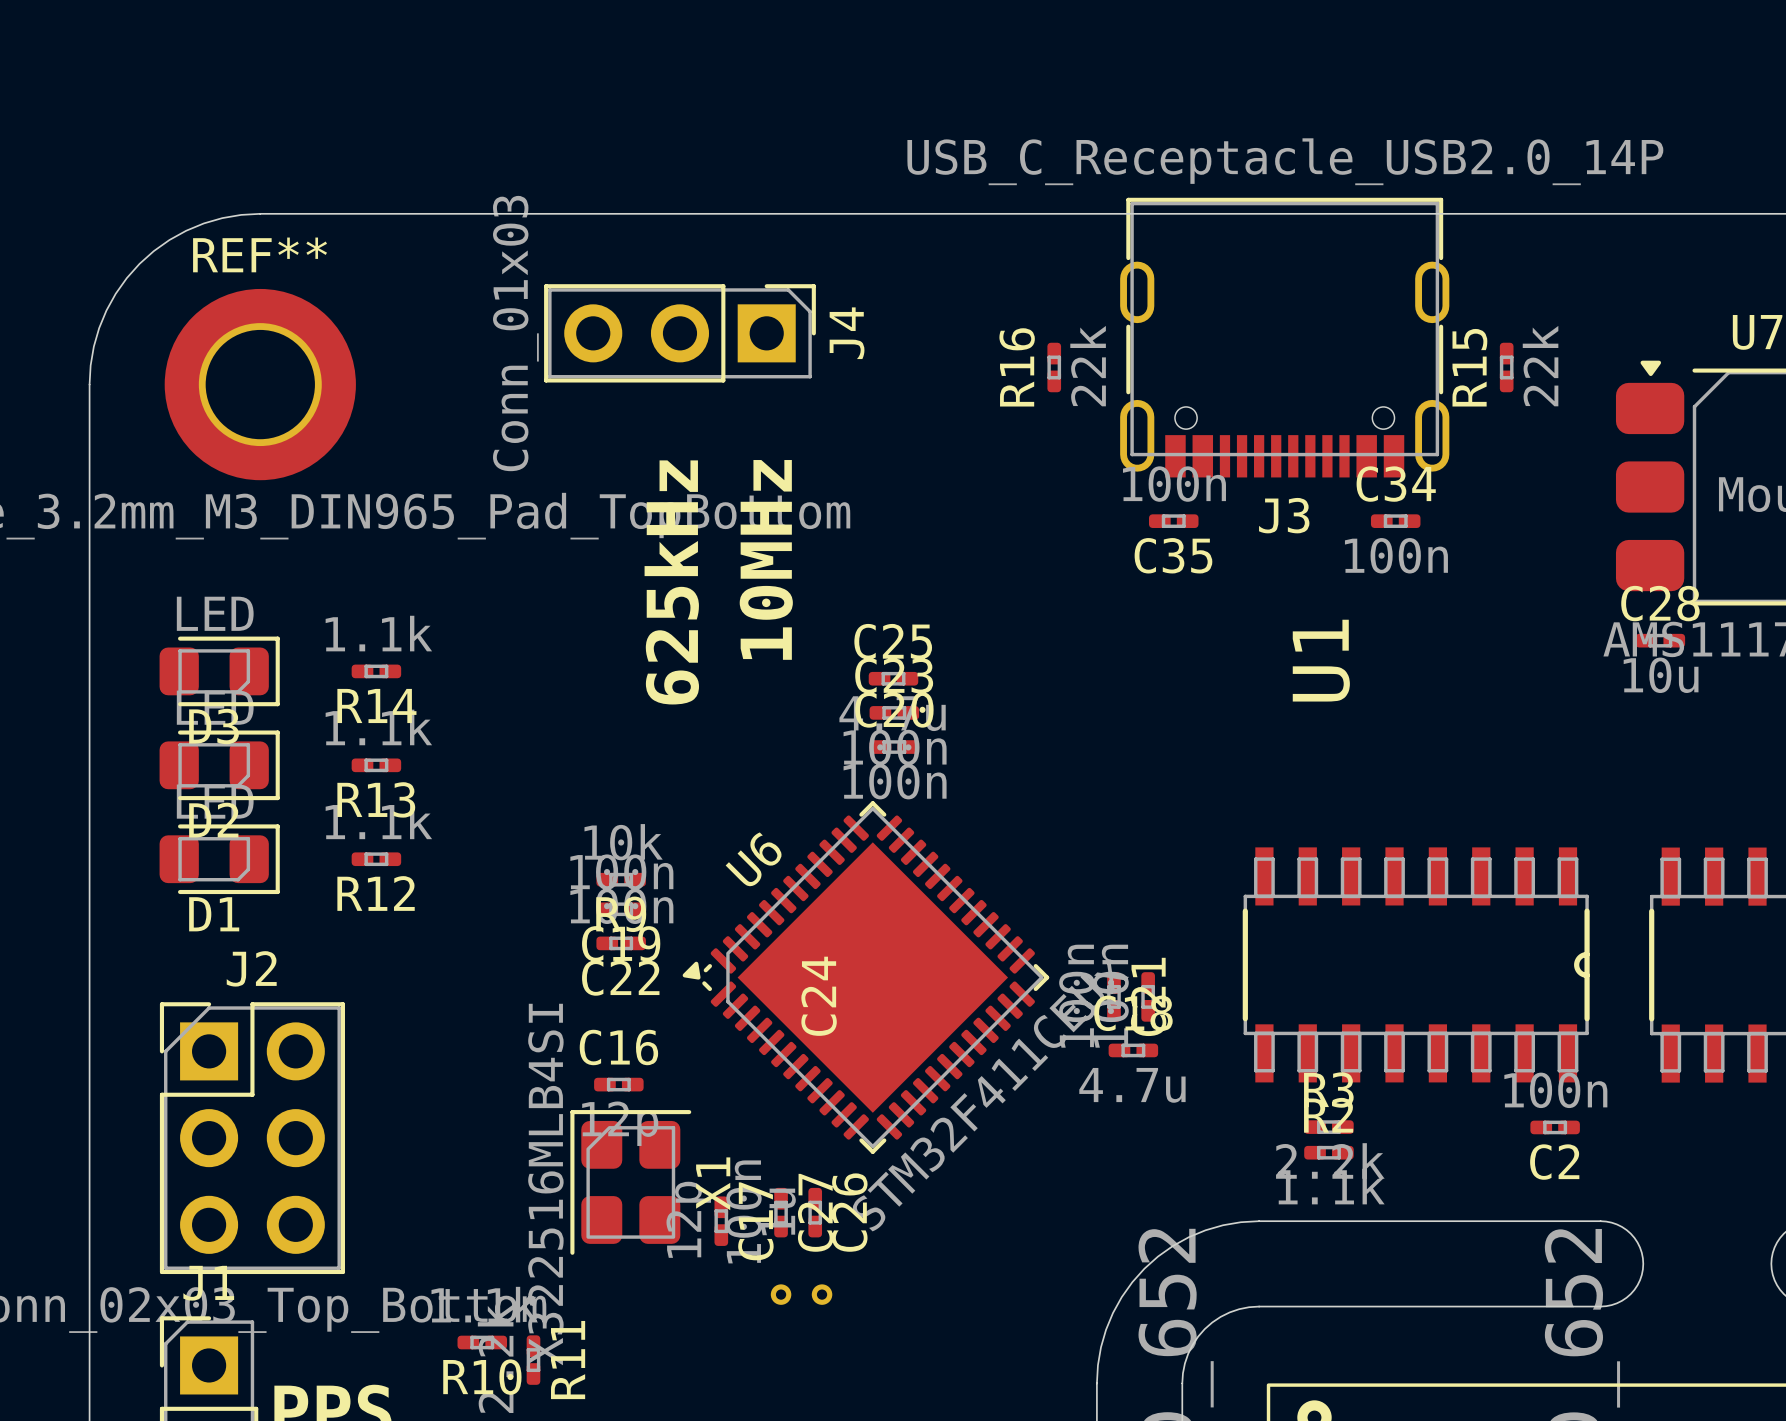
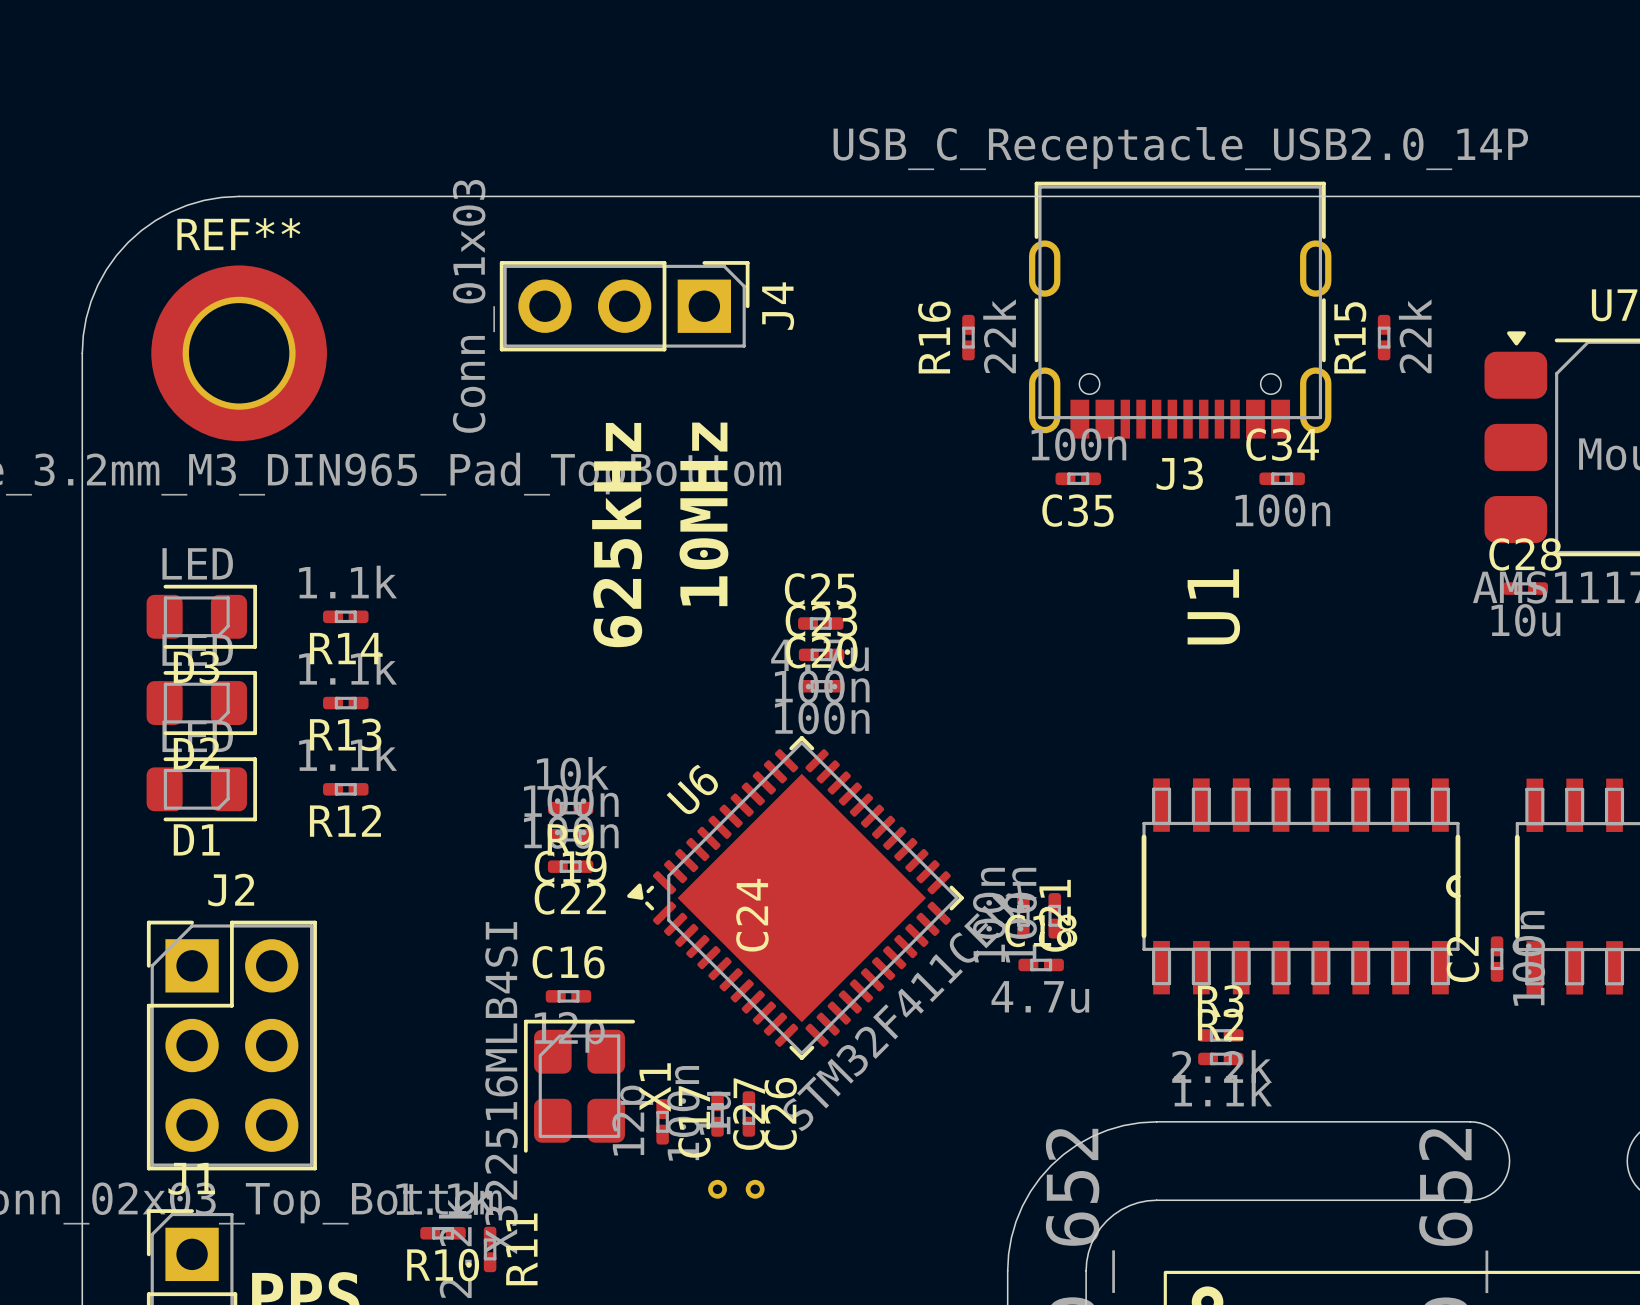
C2 rotation: 0° (1555, 1127) -> 90° clockwise (1497, 959)
C2 position: (1555, 1127) -> (1497, 959)

